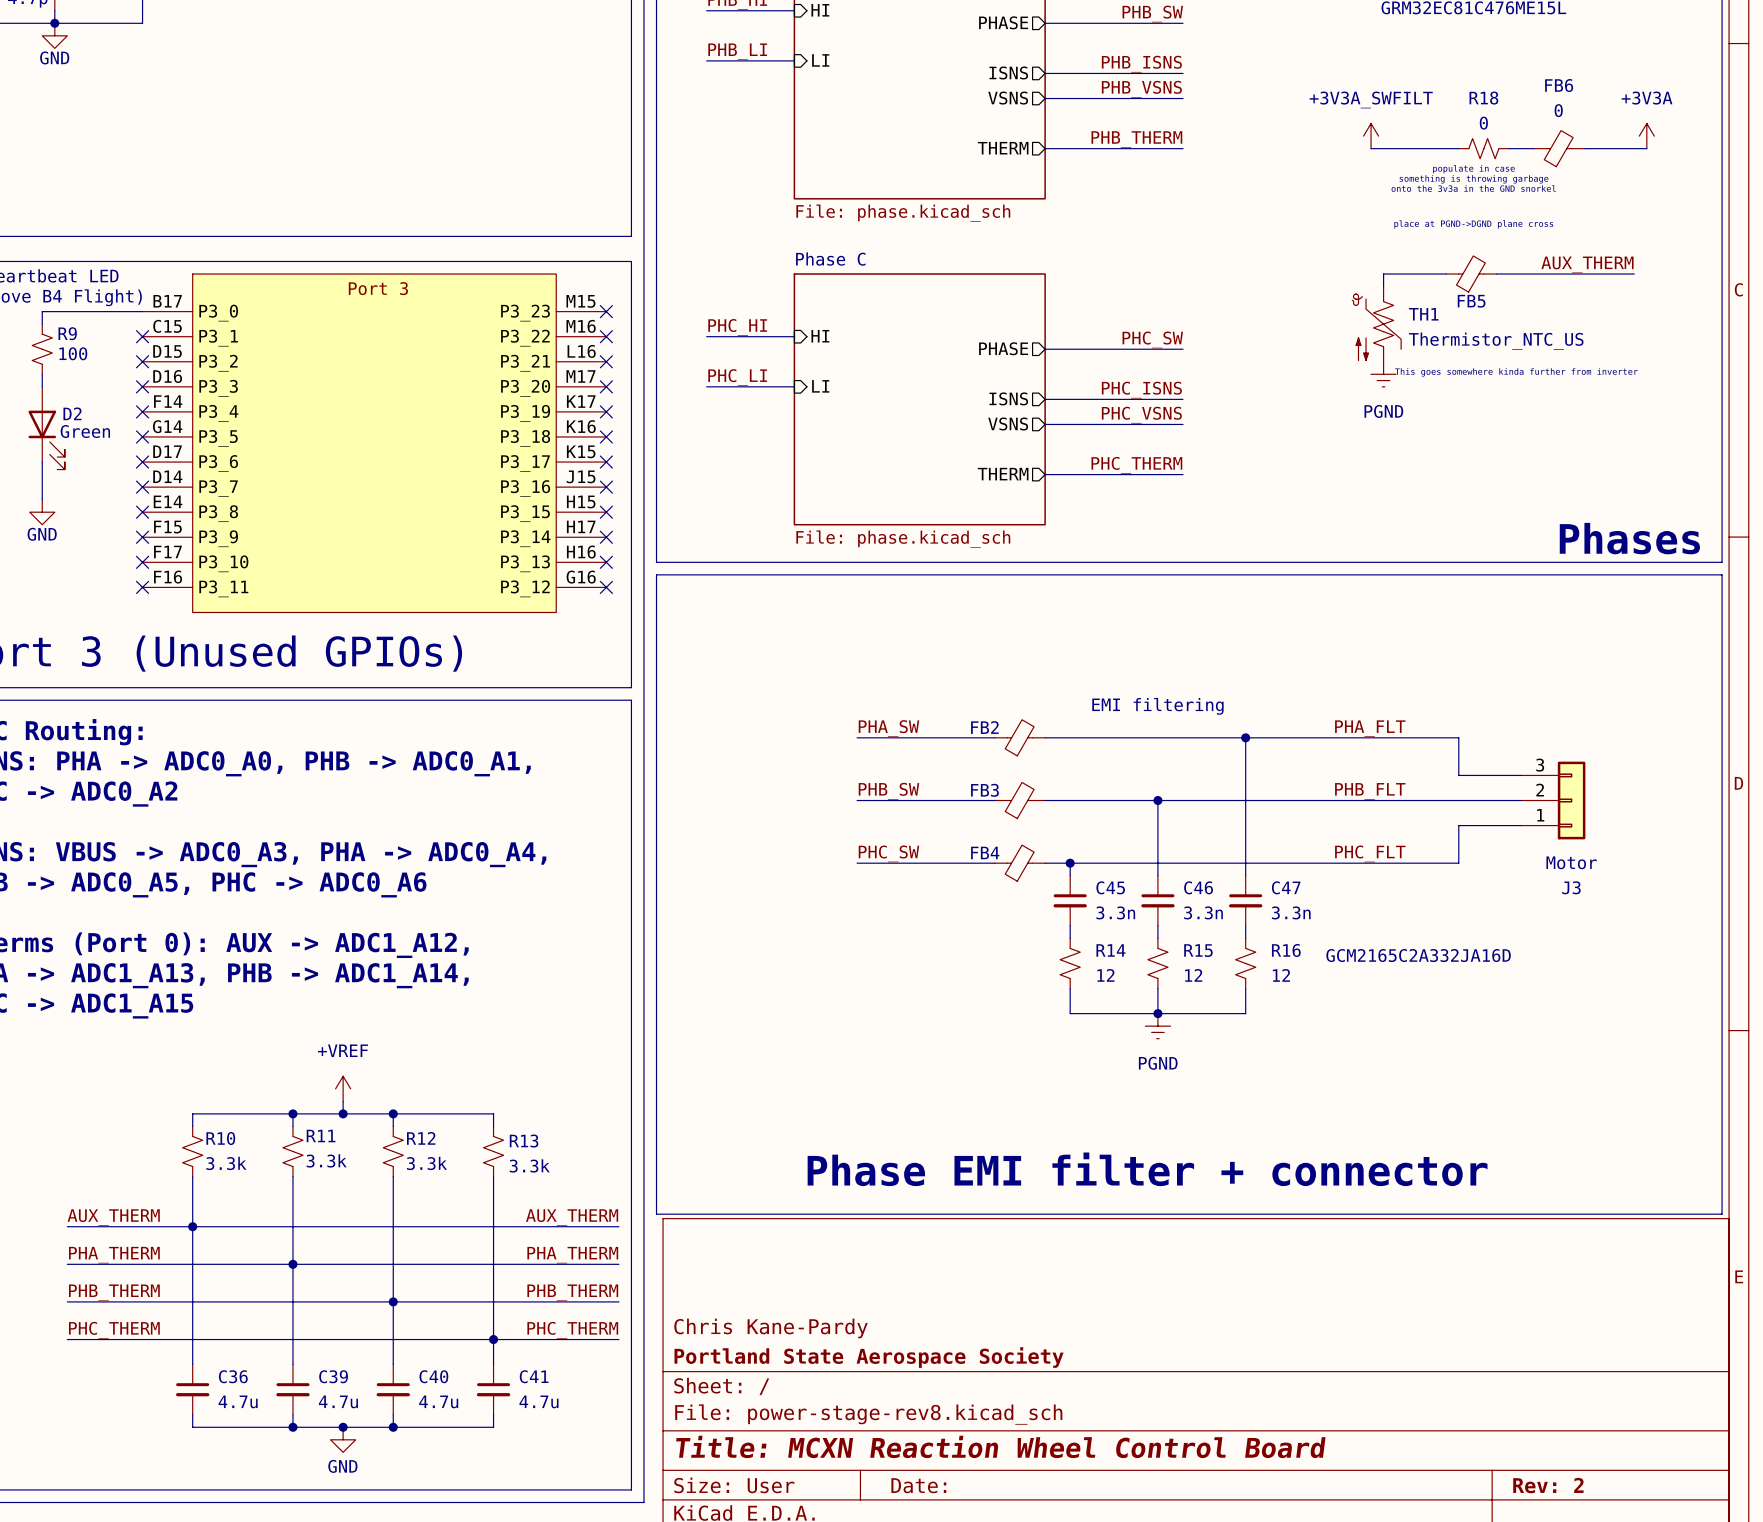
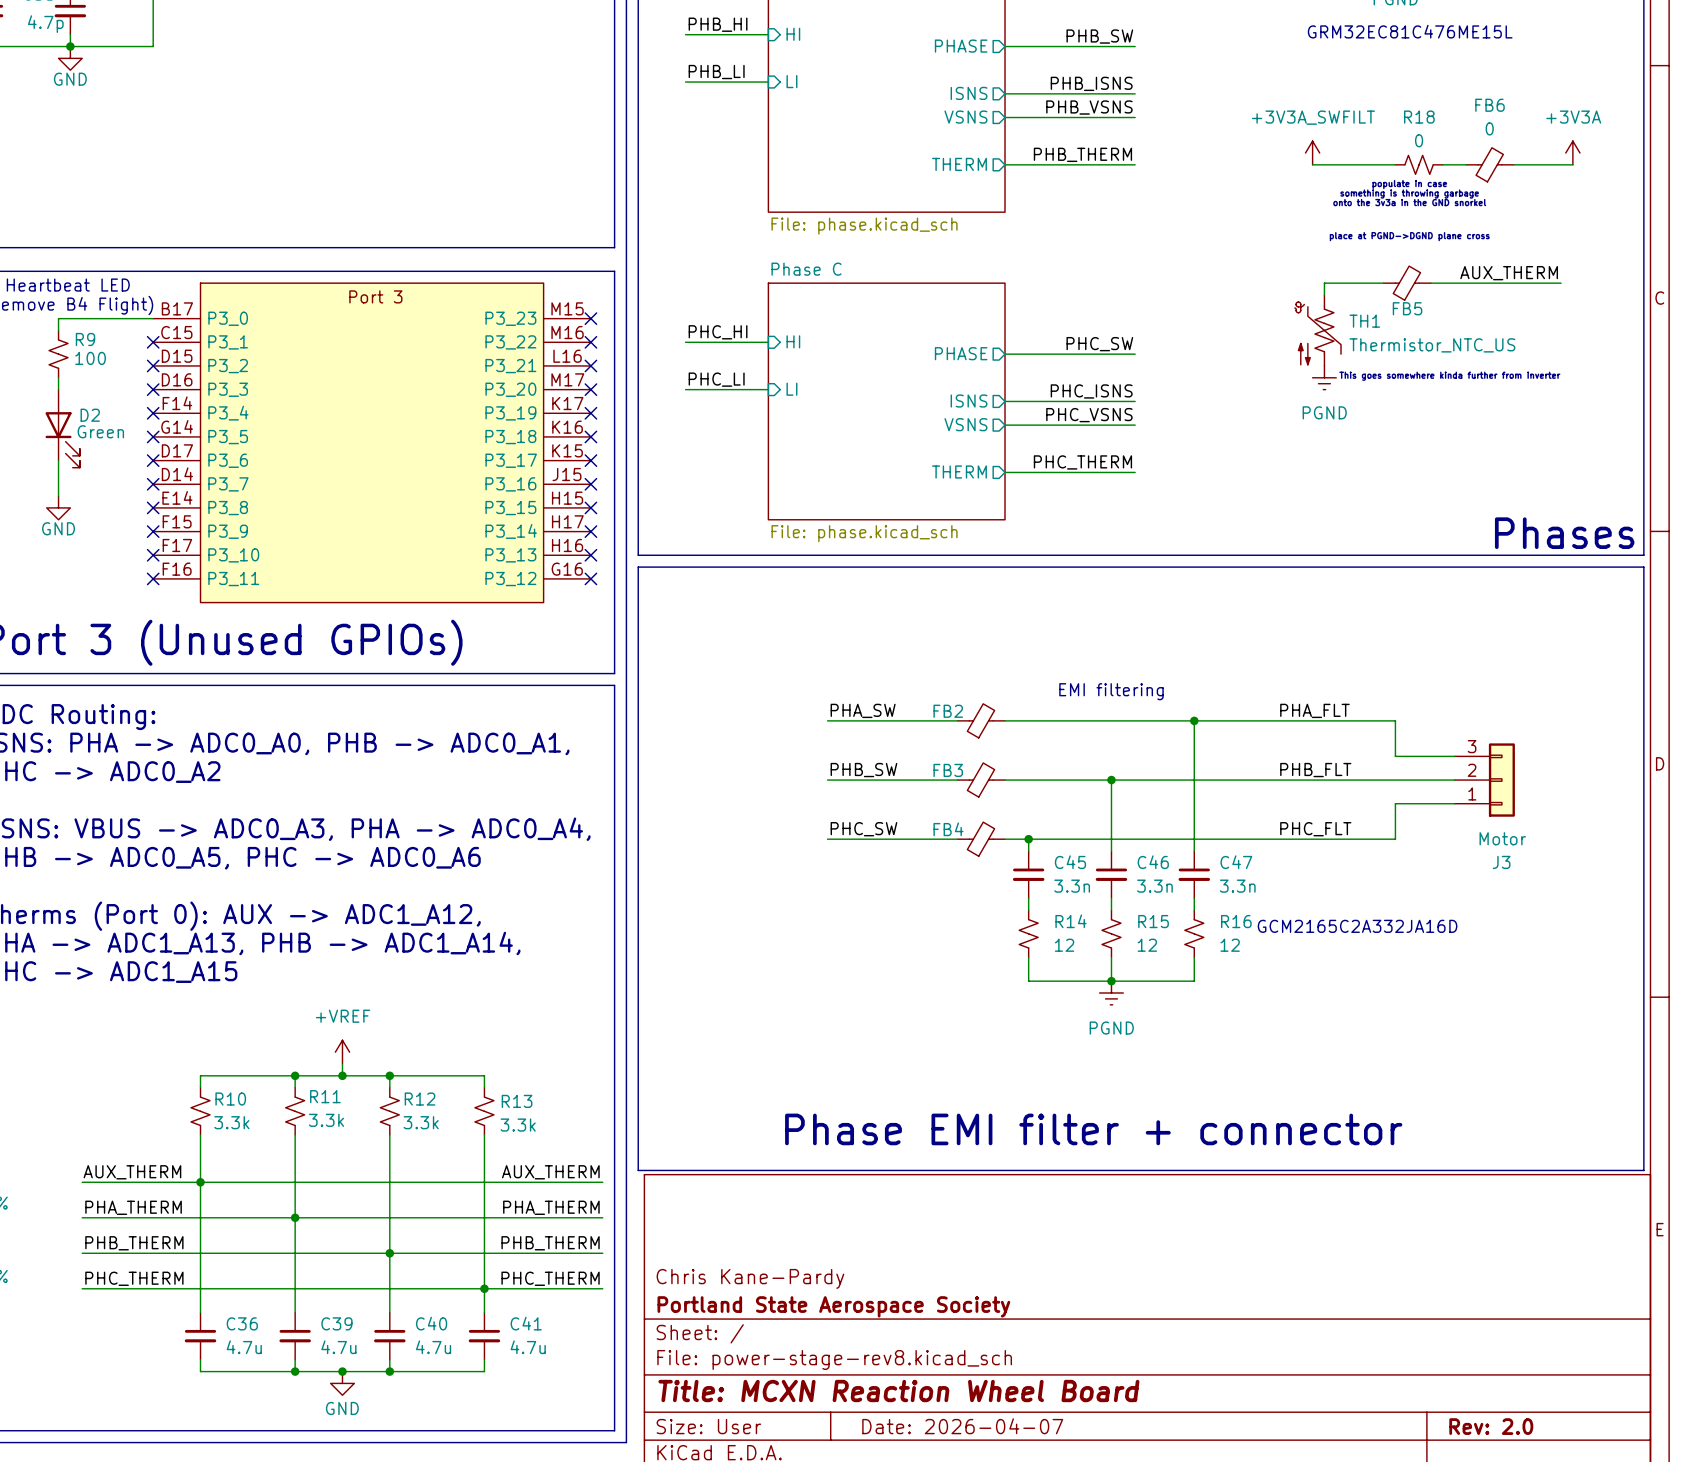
title block: Title: MCXN Reaction Wheel Control Board (1000, 1446) -> Title: MCXN Reaction Wheel Board (898, 1391)
title block: Date: (918, 1485) -> Date: 2026-04-07 (962, 1426)
title block: Rev: 2 (1548, 1485) -> Rev: 2.0 (1491, 1426)

